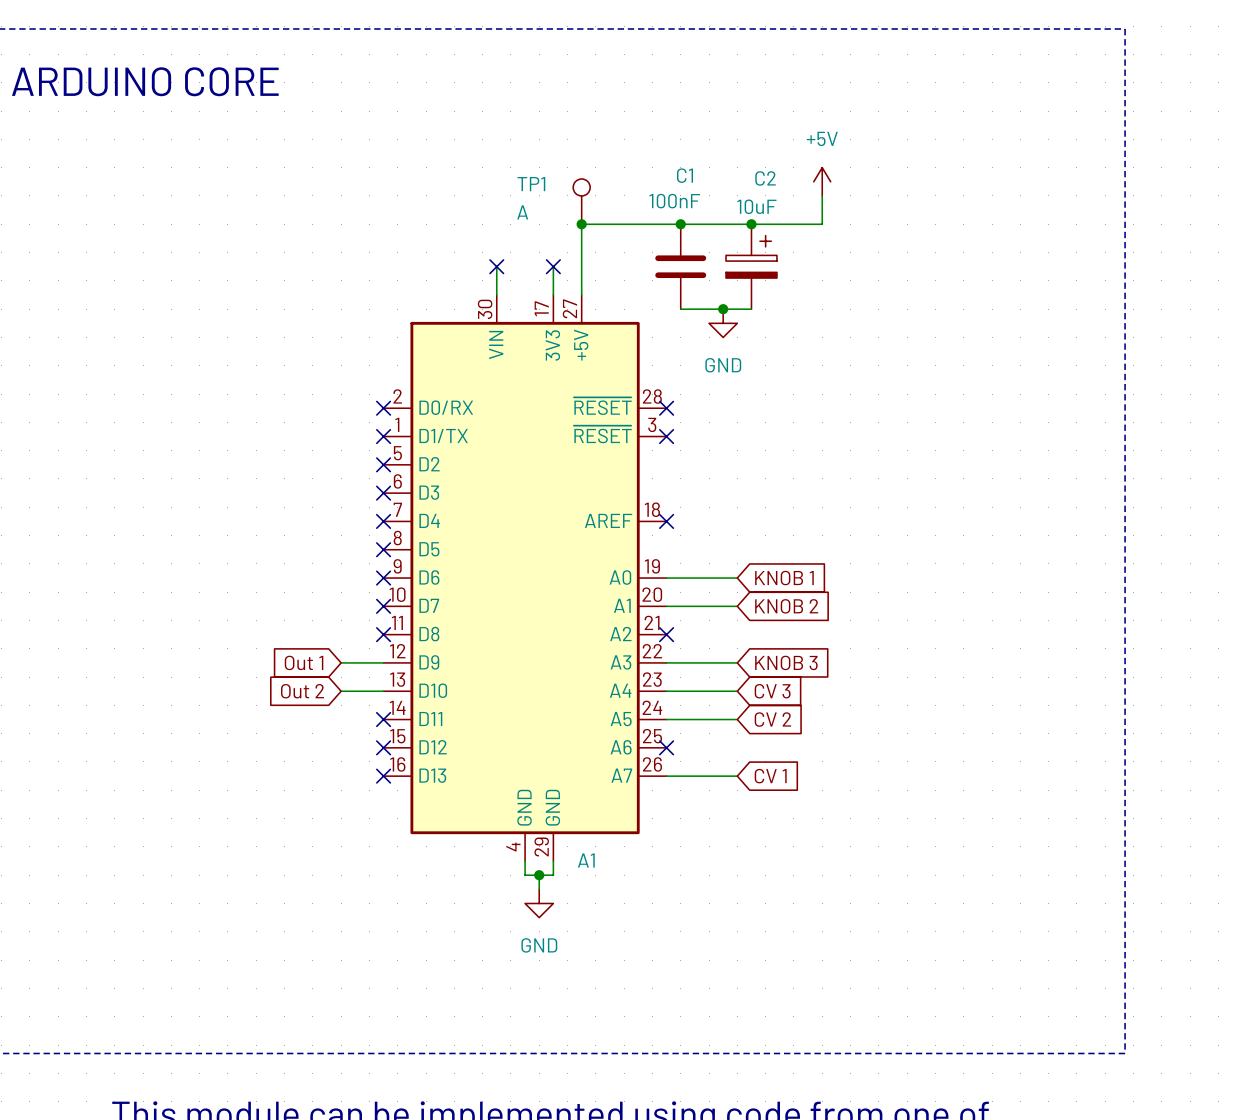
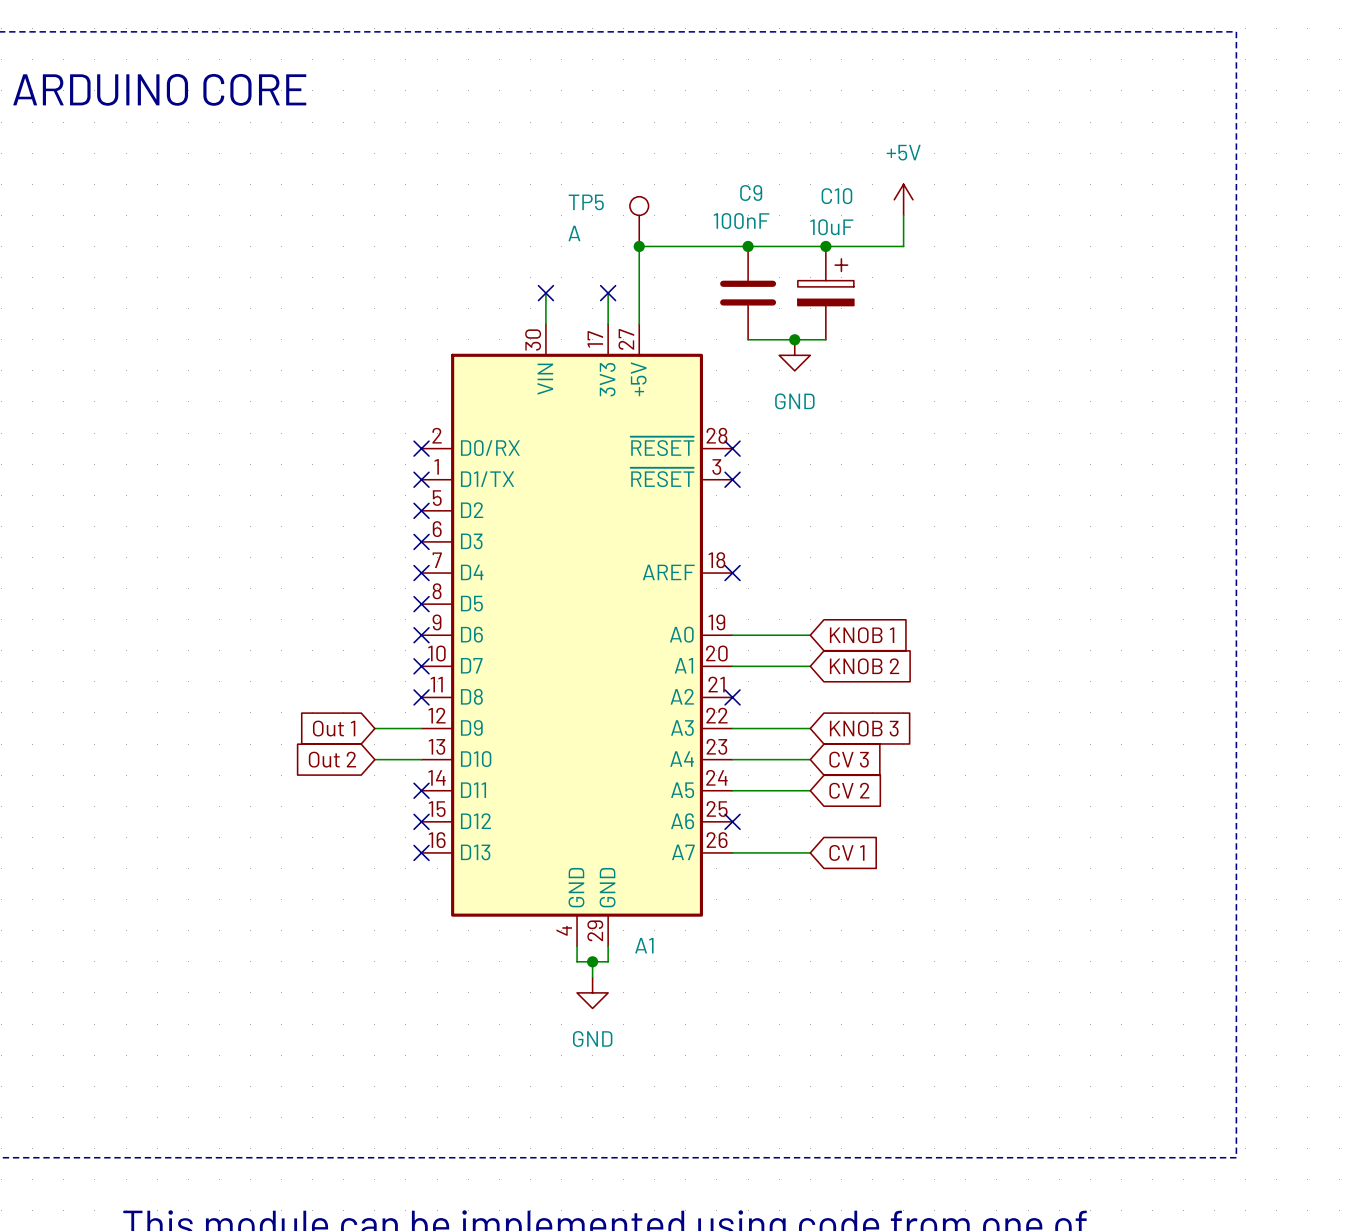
C1 name: C1 (684, 175) -> C9 (751, 193)
C2 name: C2 (765, 178) -> C10 (836, 196)
TP1 name: TP1 (531, 184) -> TP5 (586, 202)

